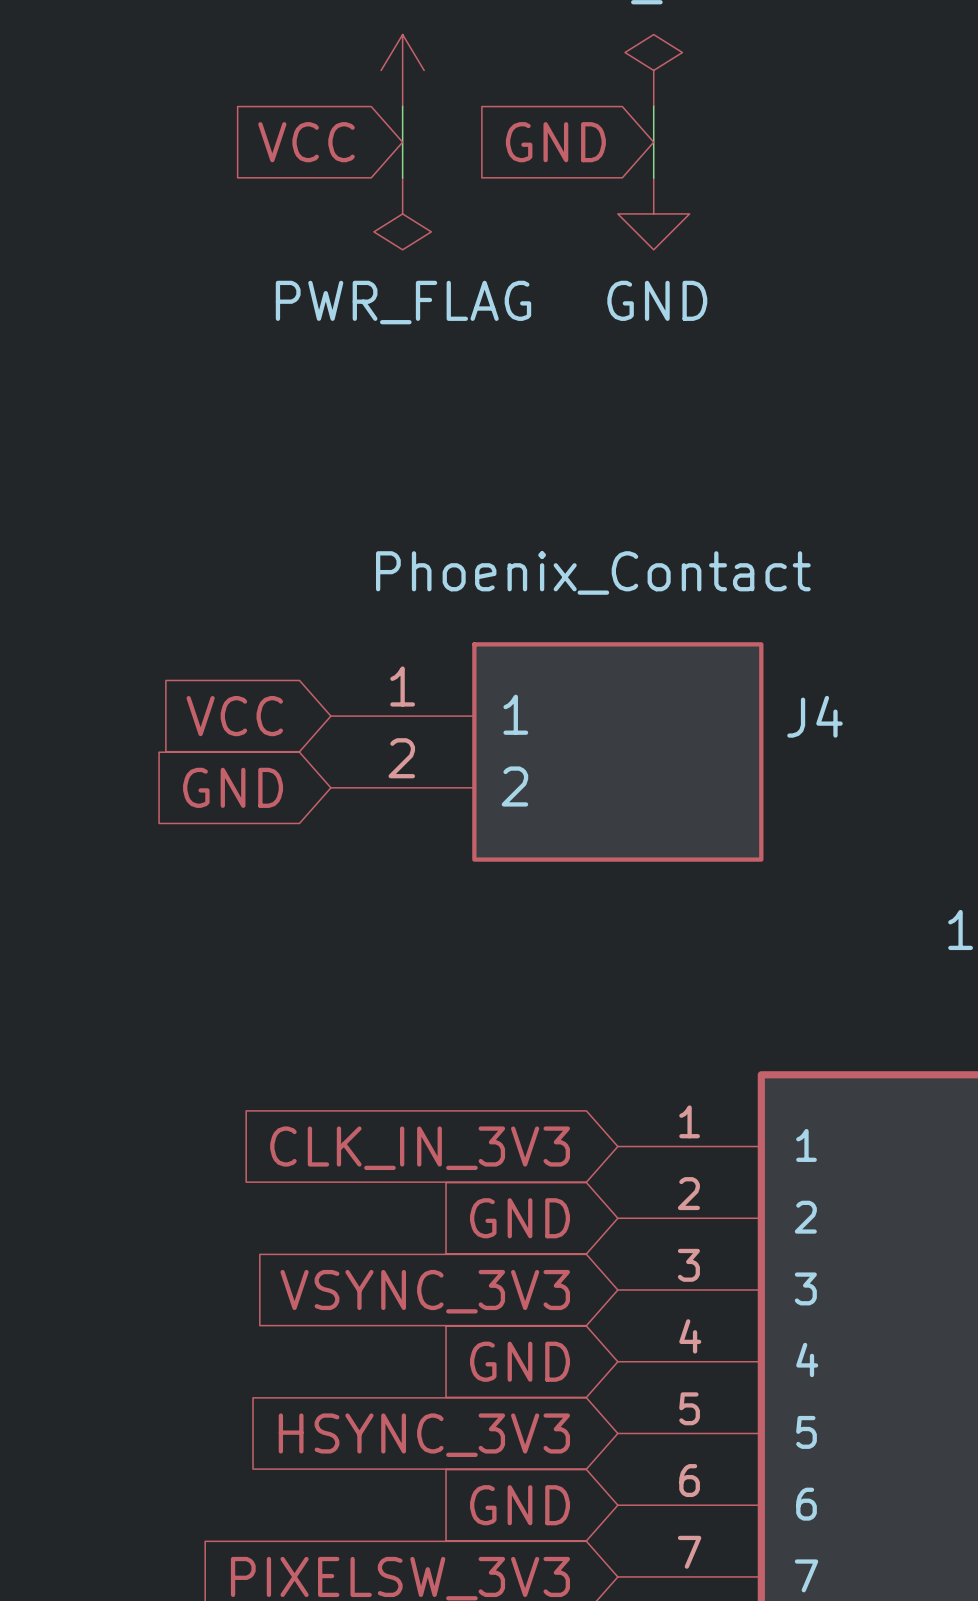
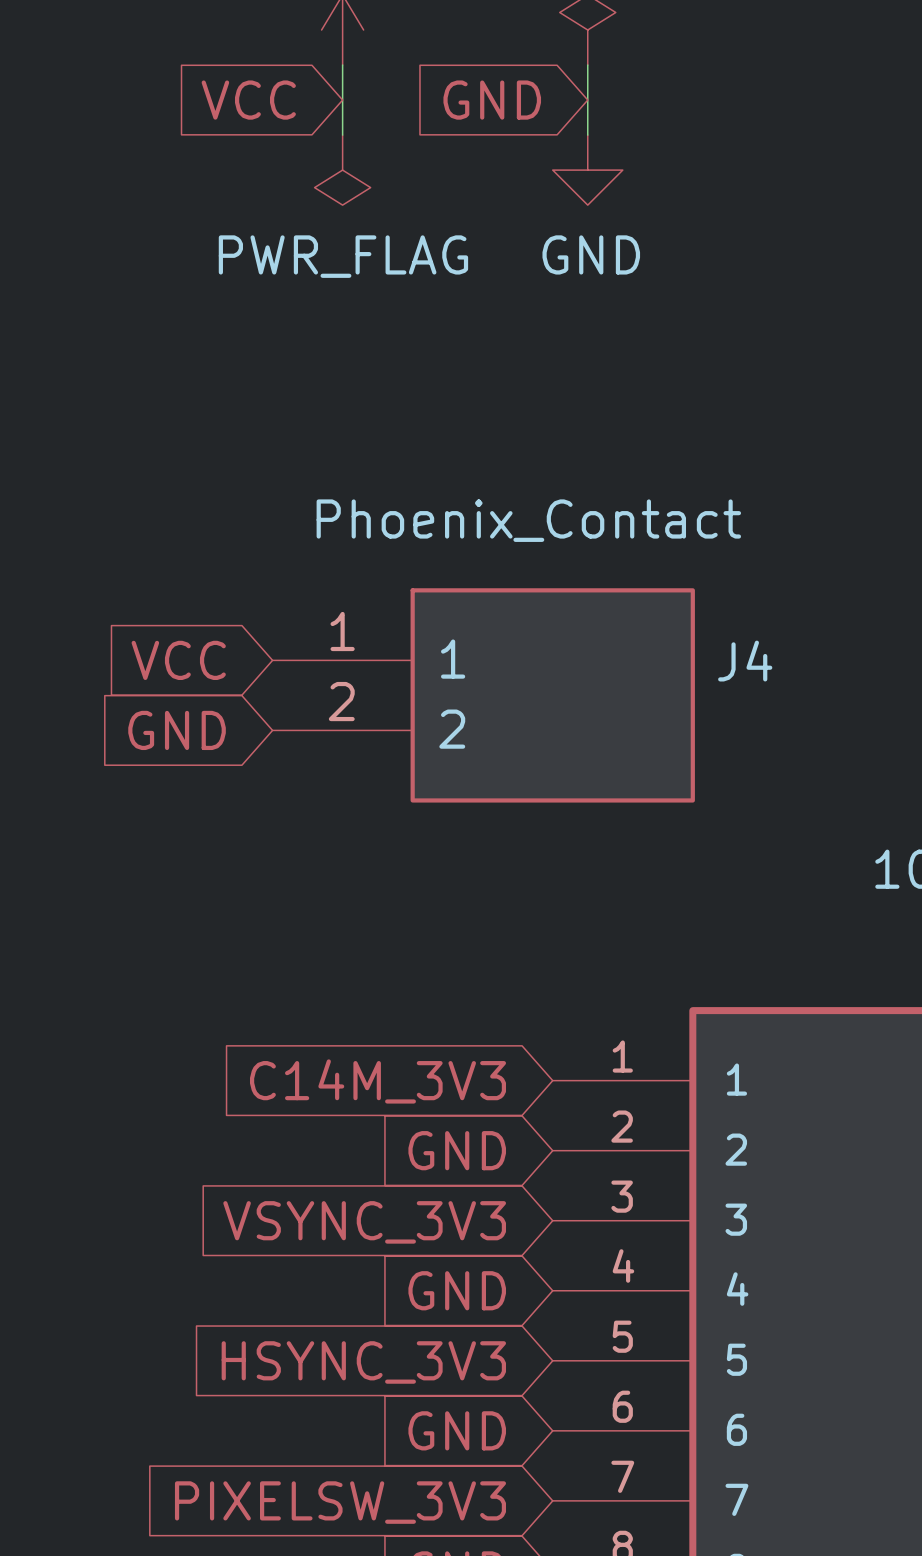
global label: CLK_IN_3V3 (420, 1148) -> C14M_3V3 (378, 1081)

